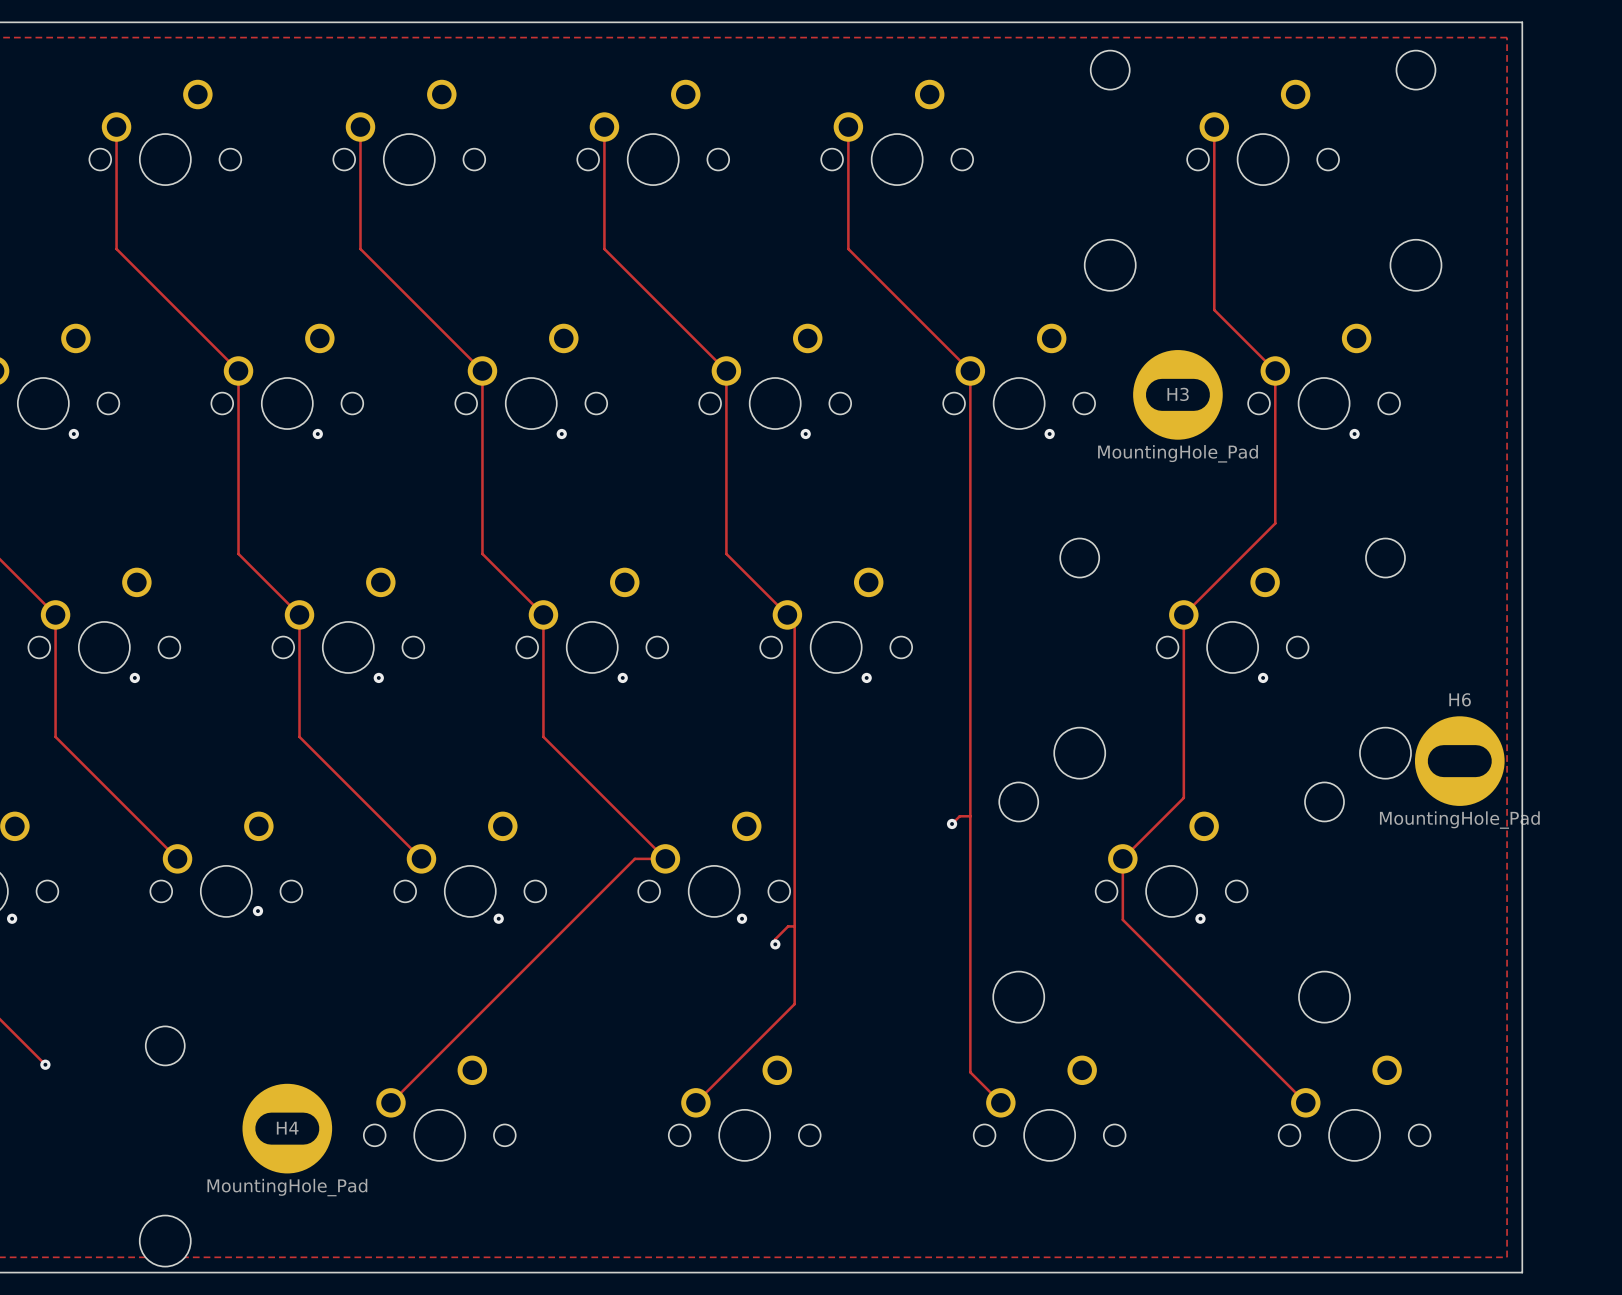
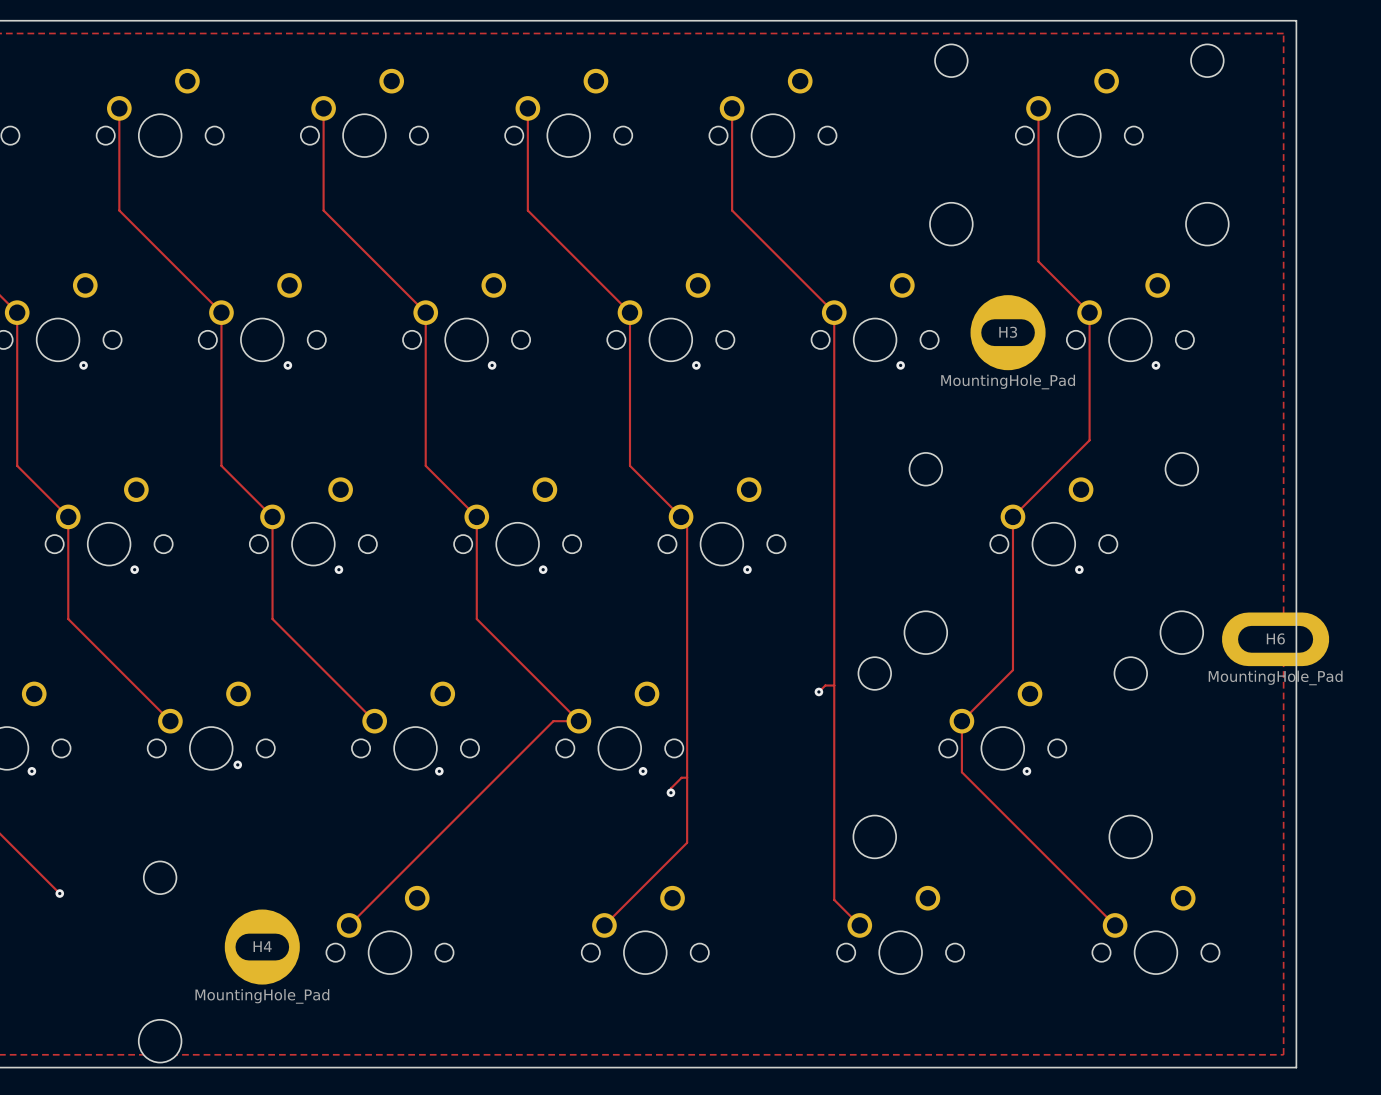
H6 name position: H6 (1460, 699) -> H6 (1275, 638)
H6 footprint: [1414, 716, 1505, 806] -> [1221, 612, 1330, 667]

